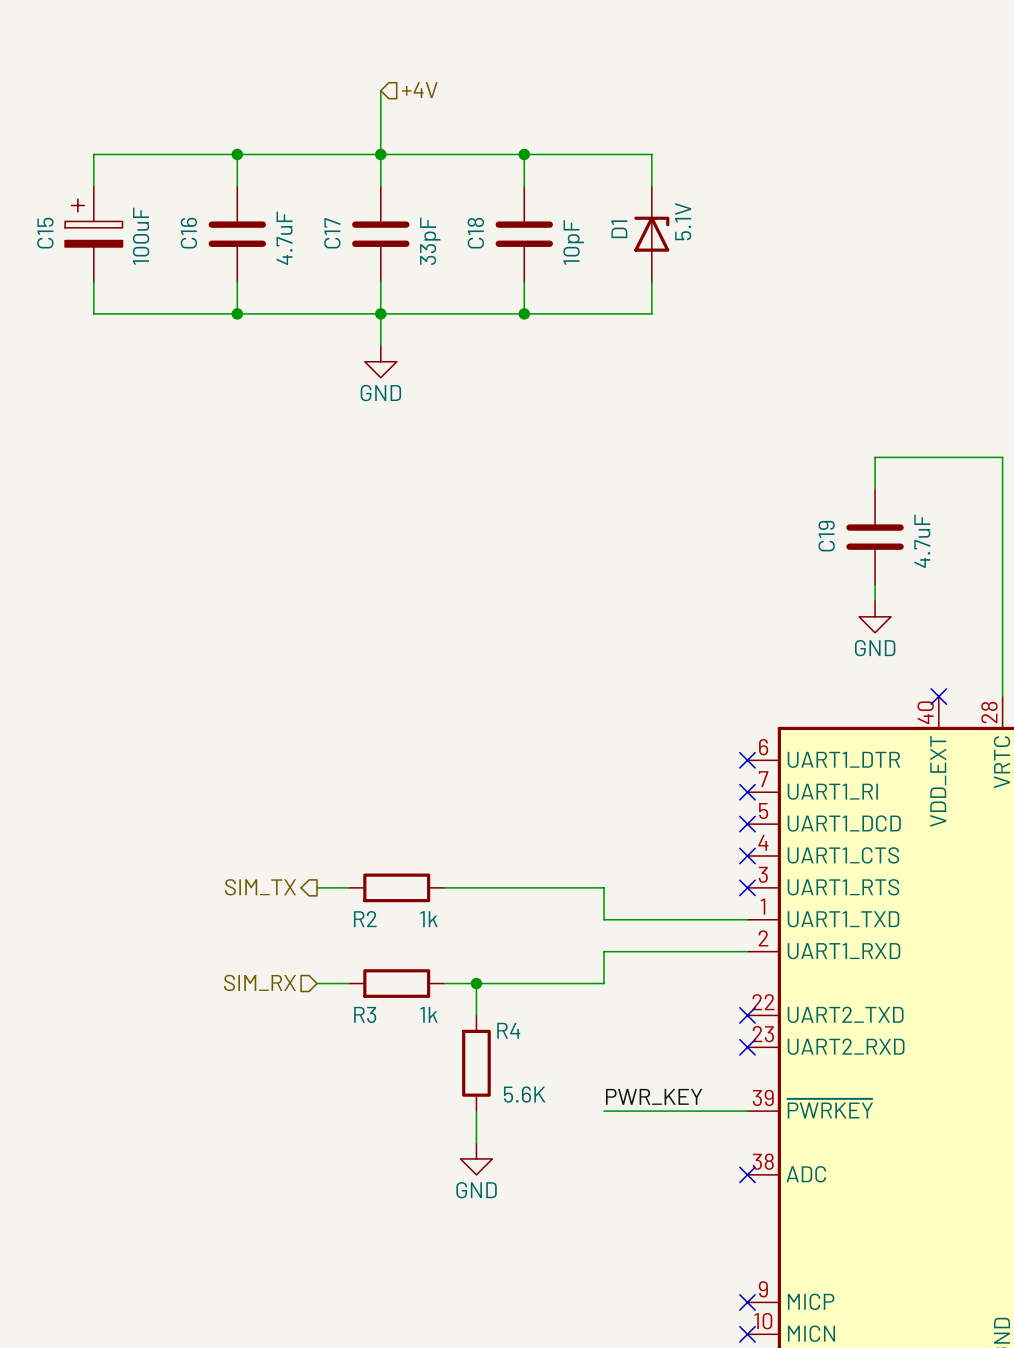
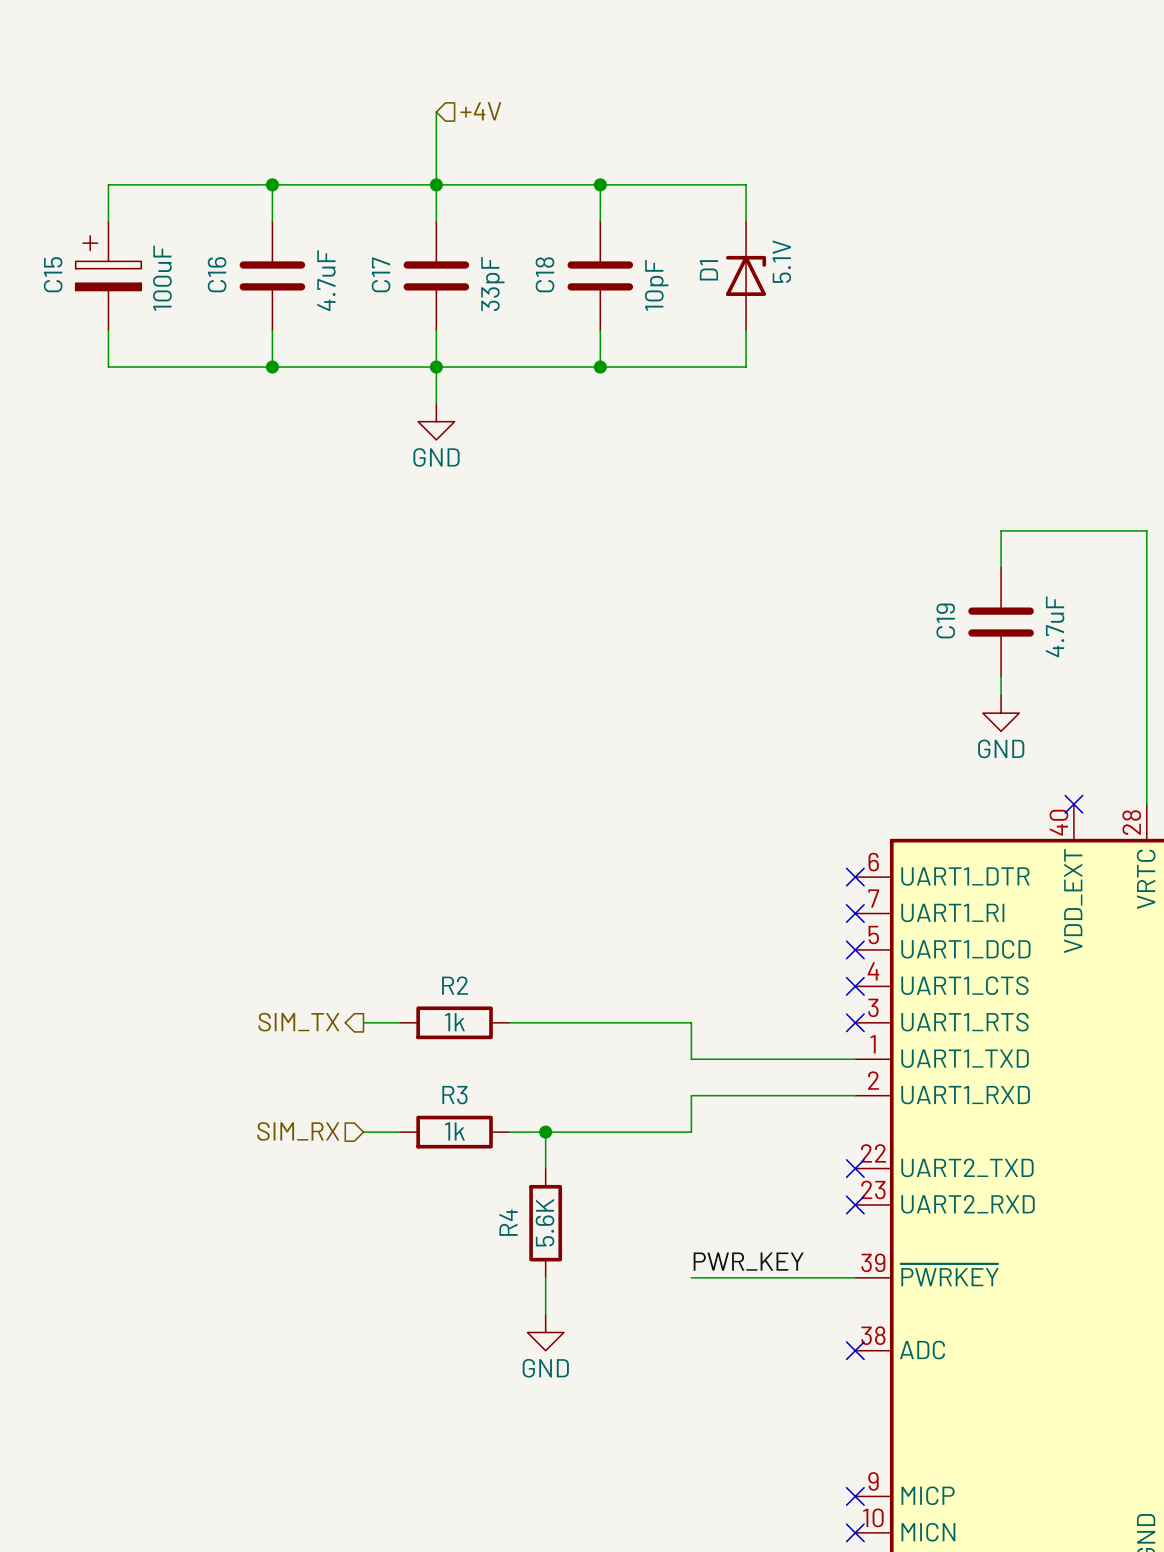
R2 name position: R2 (365, 919) -> R2 (455, 985)
R2 value position: 1k (428, 919) -> 1k (454, 1022)
R3 name position: R3 (365, 1014) -> R3 (454, 1095)
R3 value position: 1k (428, 1014) -> 1k (454, 1131)
R4 name rotation: 0° (508, 1030) -> 90° counterclockwise (508, 1222)
R4 name position: R4 (508, 1030) -> R4 (508, 1222)
R4 value rotation: 0° (524, 1094) -> 90° counterclockwise (544, 1222)

